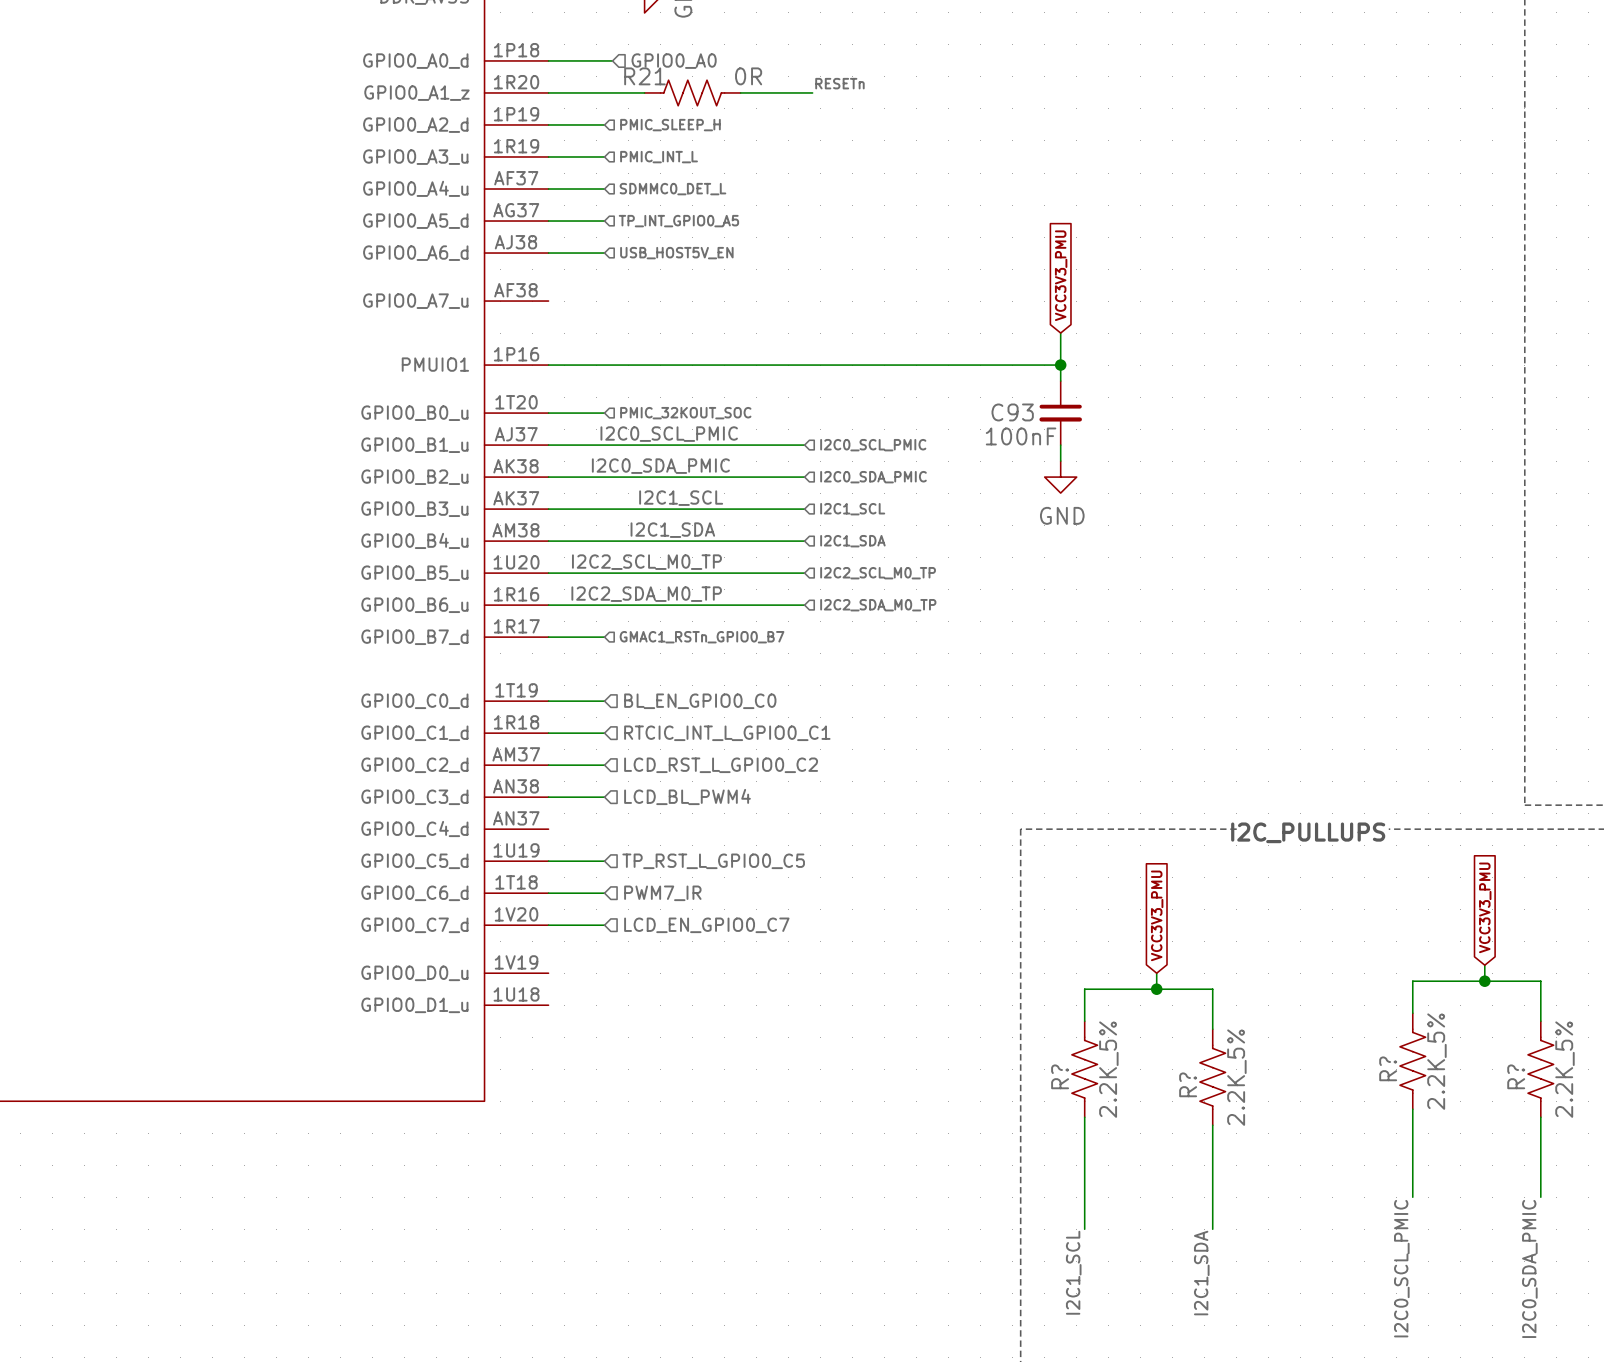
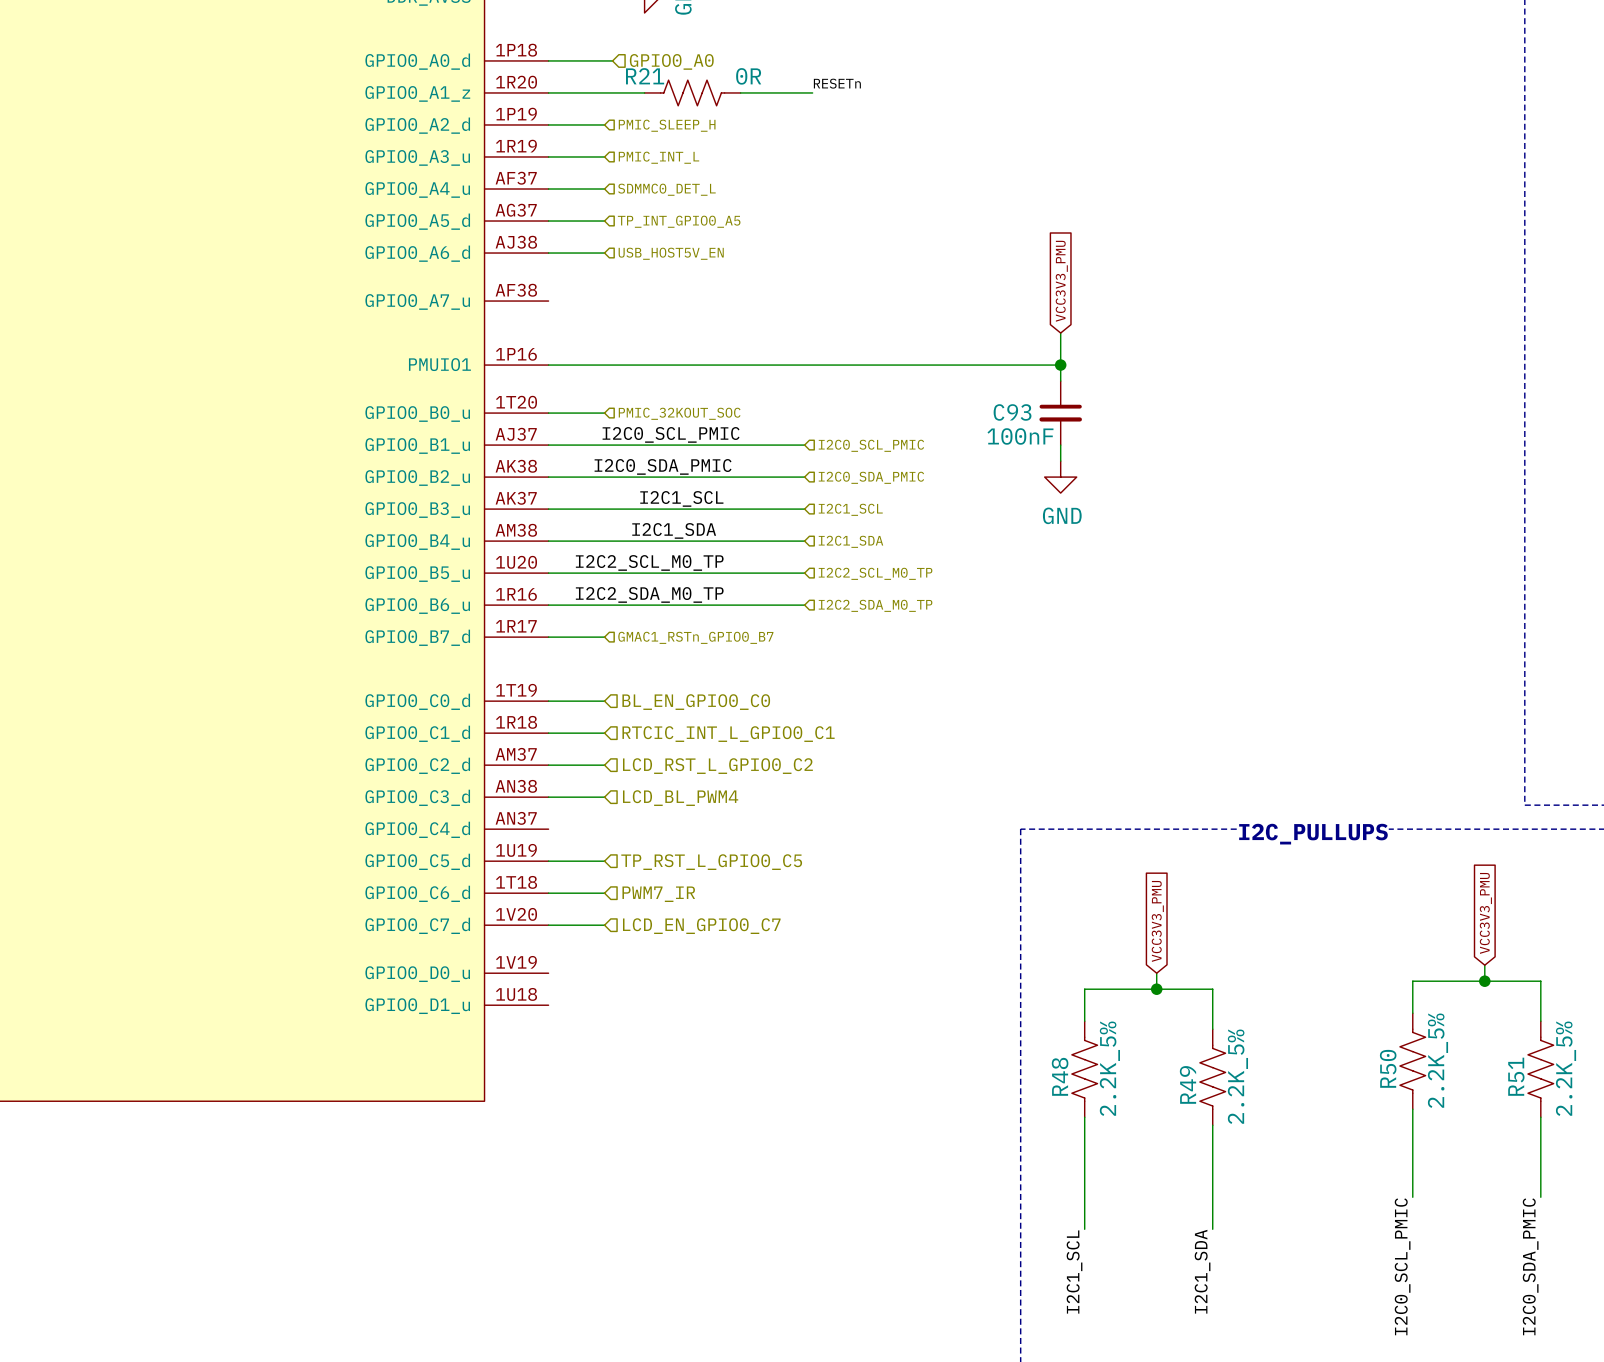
R? name: R? (1388, 1068) -> R50 (1388, 1068)
R? name: R? (1060, 1076) -> R48 (1060, 1076)
R? name: R? (1516, 1076) -> R51 (1516, 1076)
R? name: R? (1188, 1084) -> R49 (1187, 1084)

